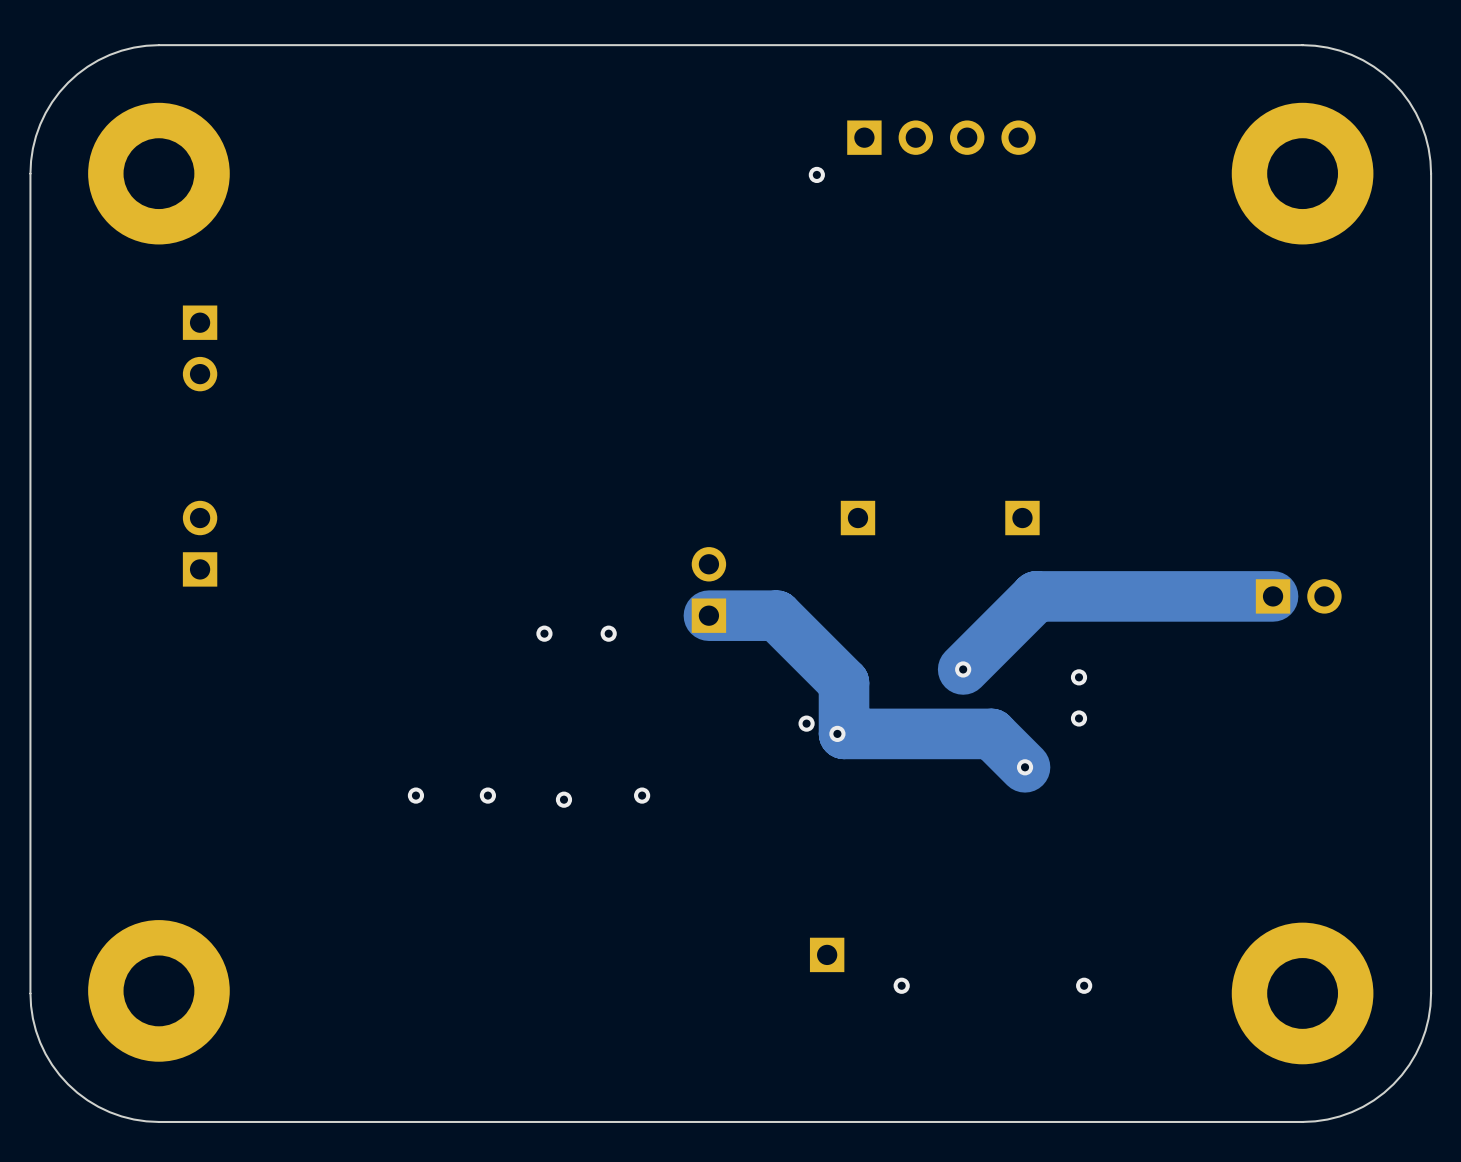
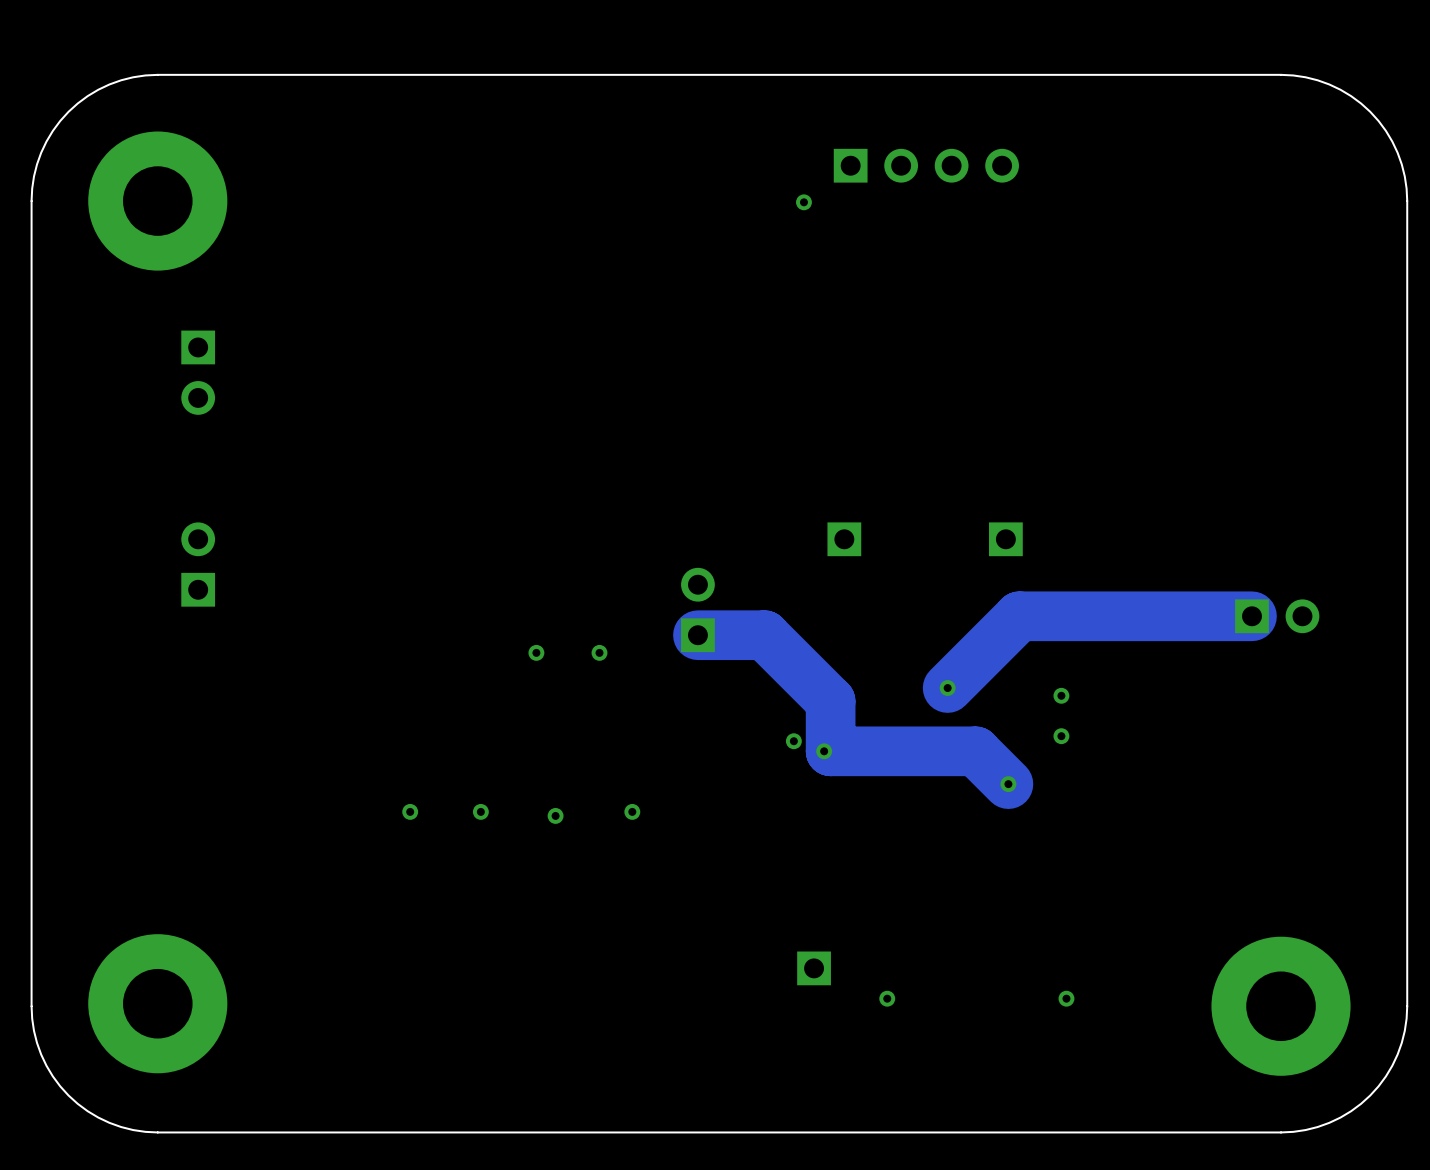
part: (1302, 173) -> none

